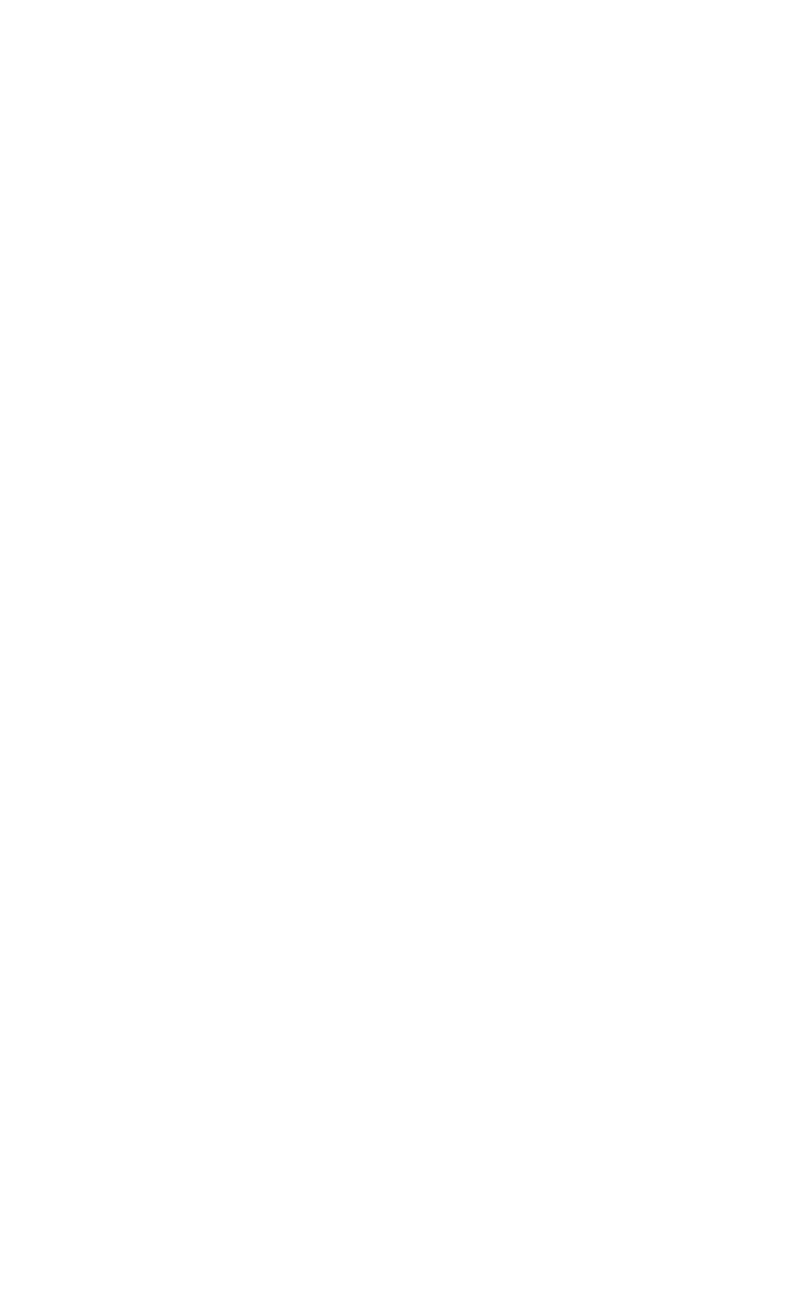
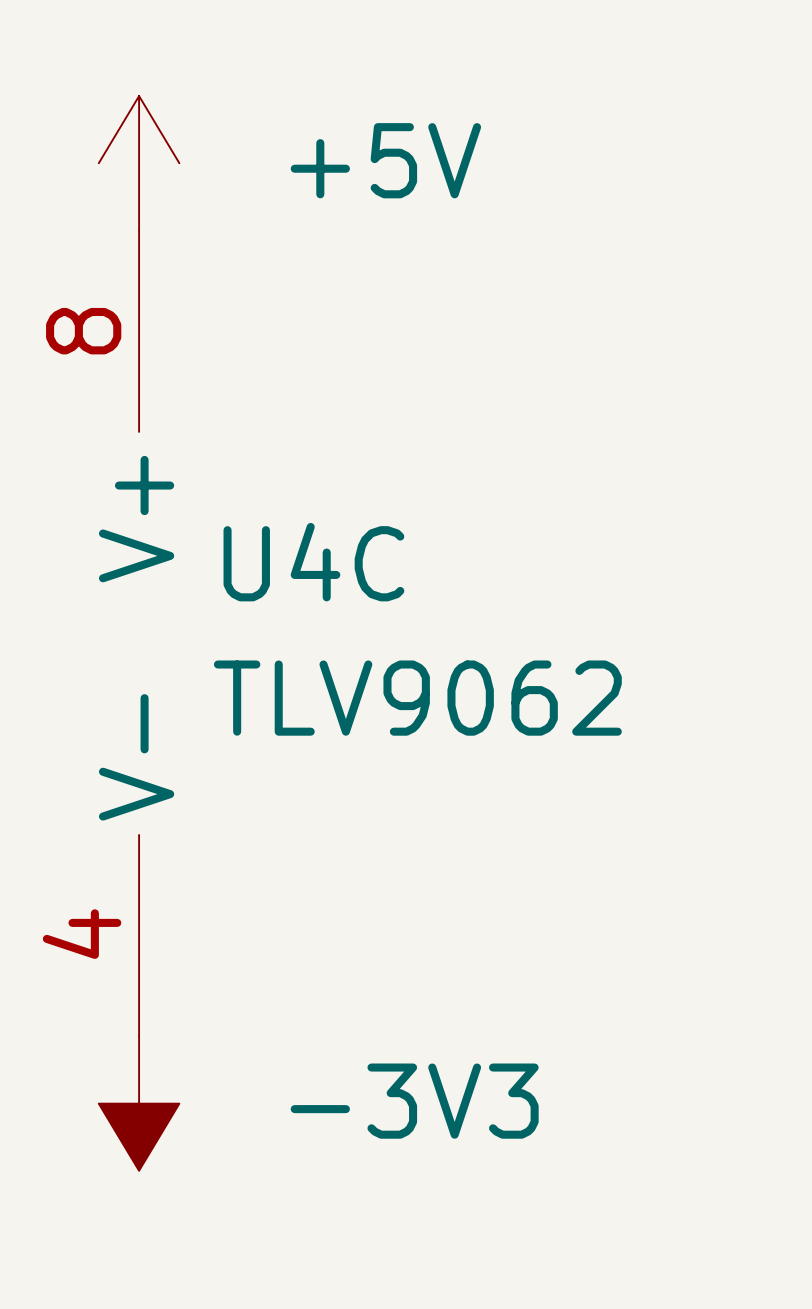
power symbol: none -> +5V (139, 163)
U4C: none -> TLV9062 (139, 633)
power symbol: none -> -3V3 (139, 1103)

